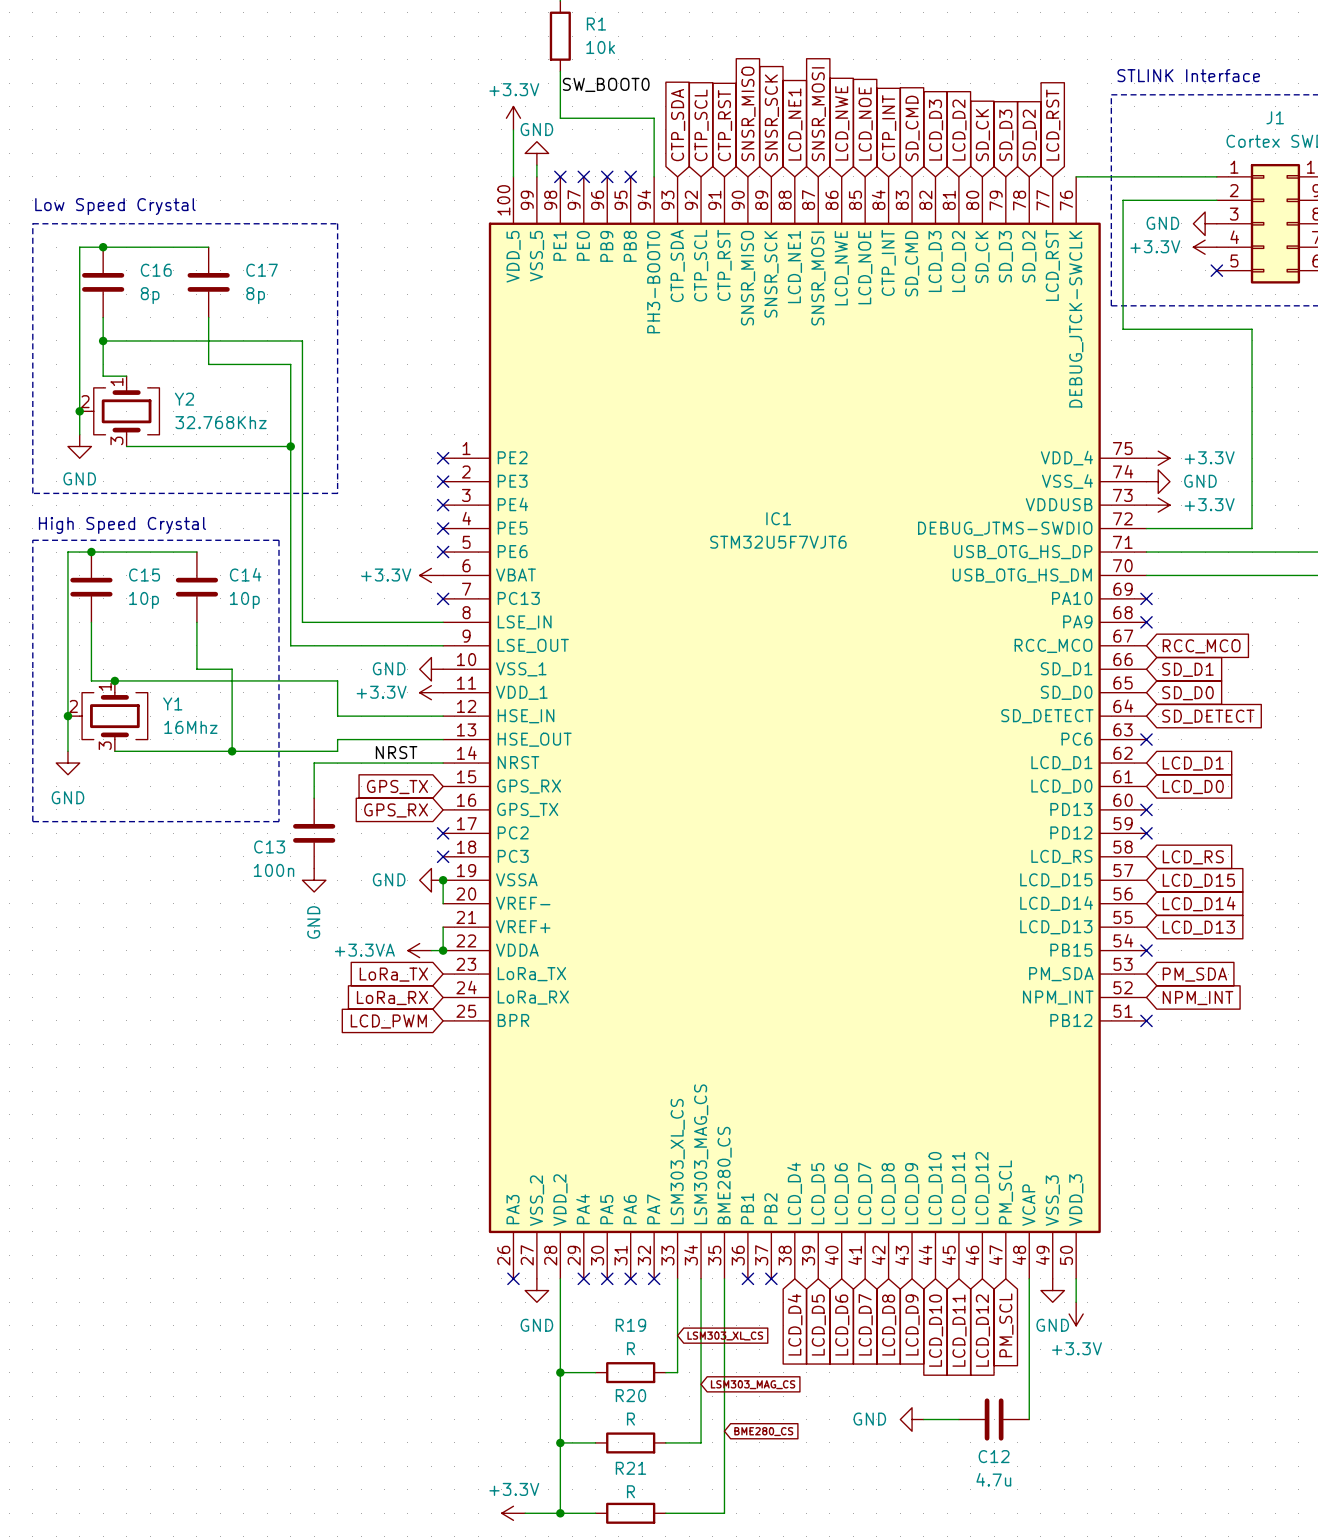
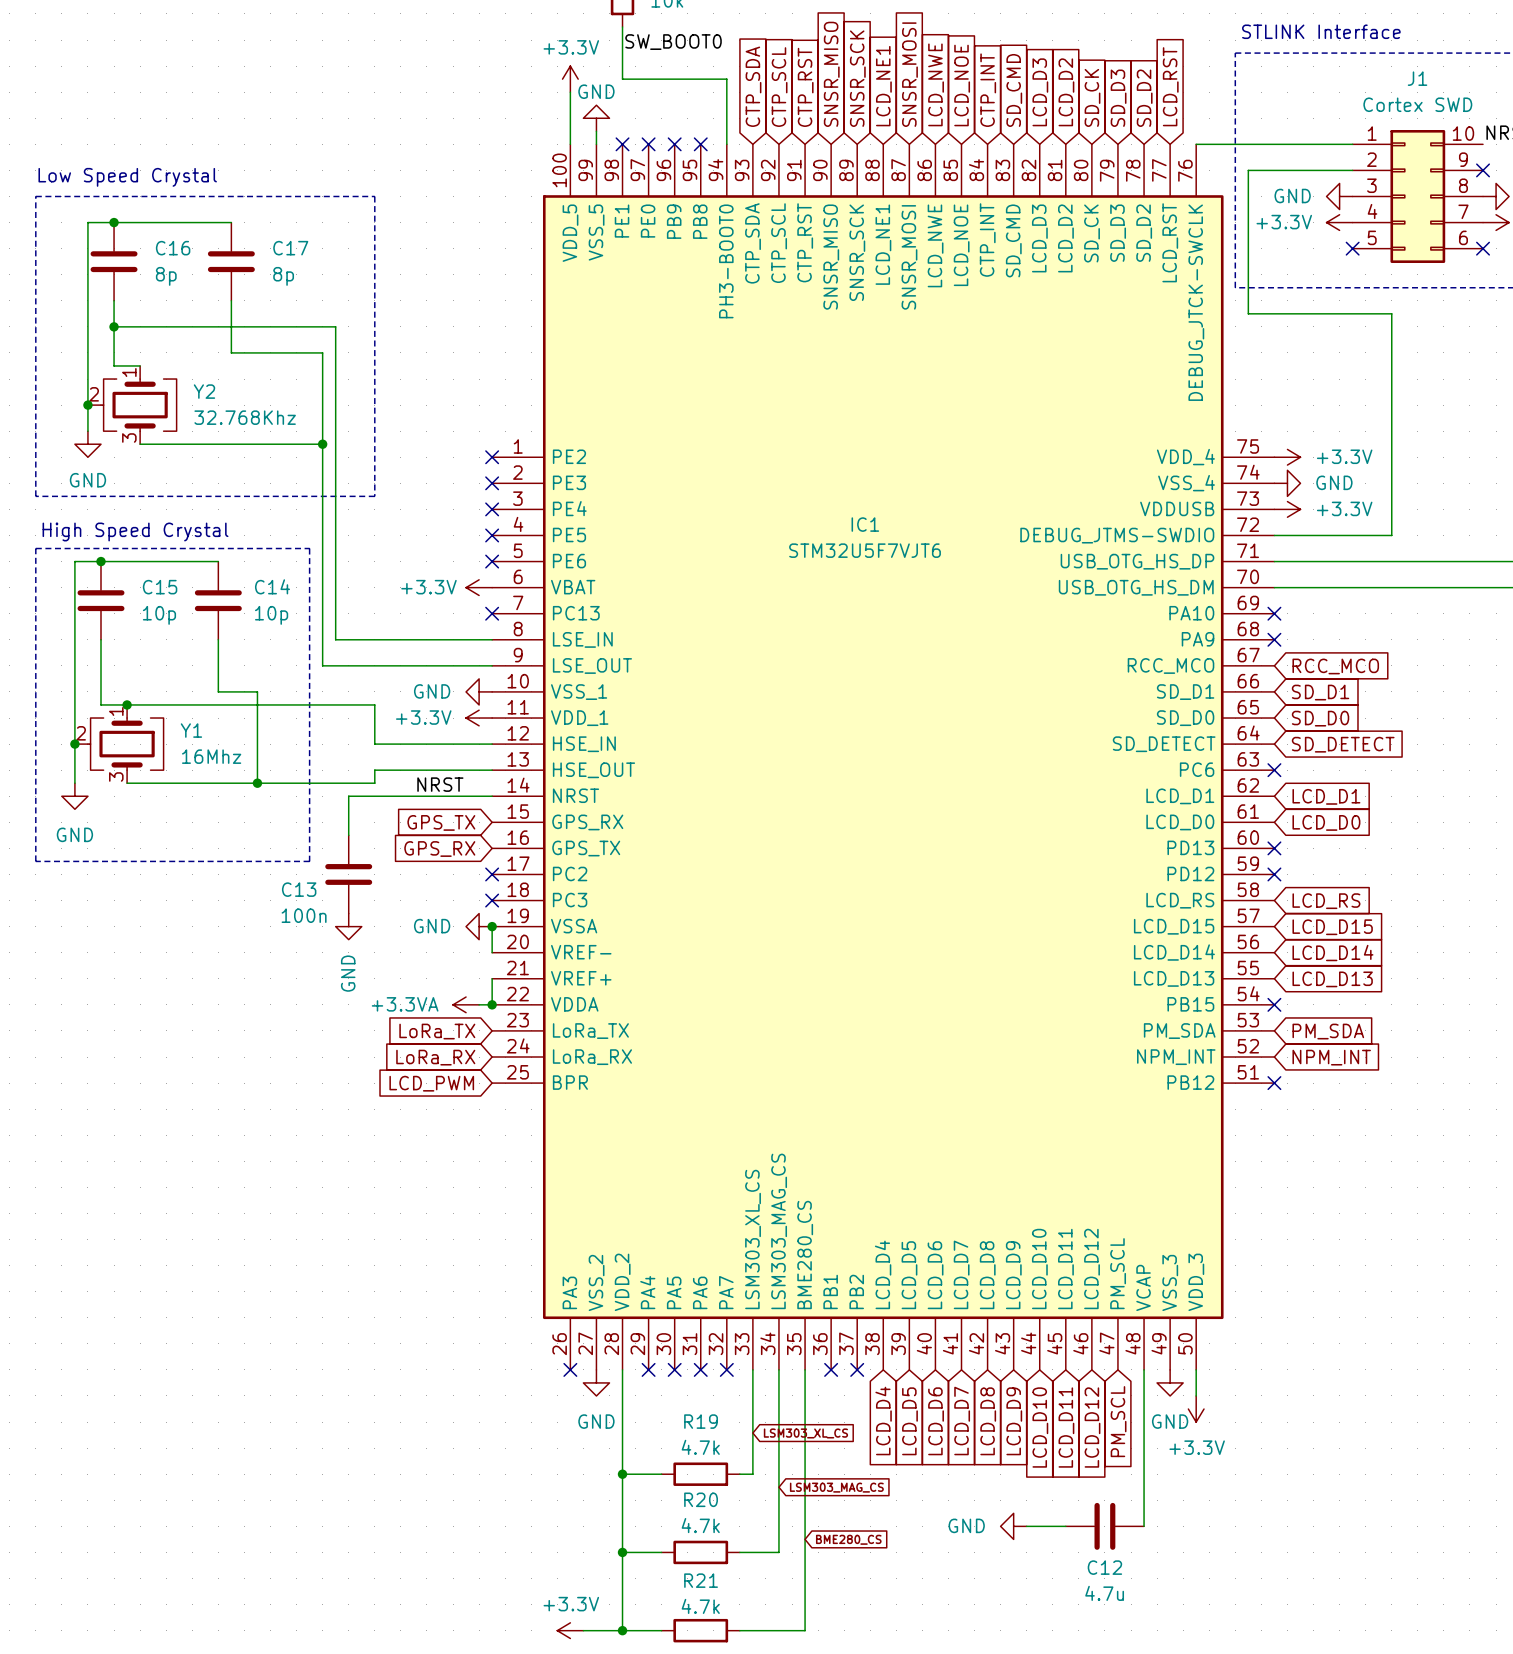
R19 value: R (630, 1348) -> 4.7k (700, 1447)
R20 value: R (630, 1419) -> 4.7k (700, 1525)
R21 value: R (630, 1491) -> 4.7k (700, 1606)

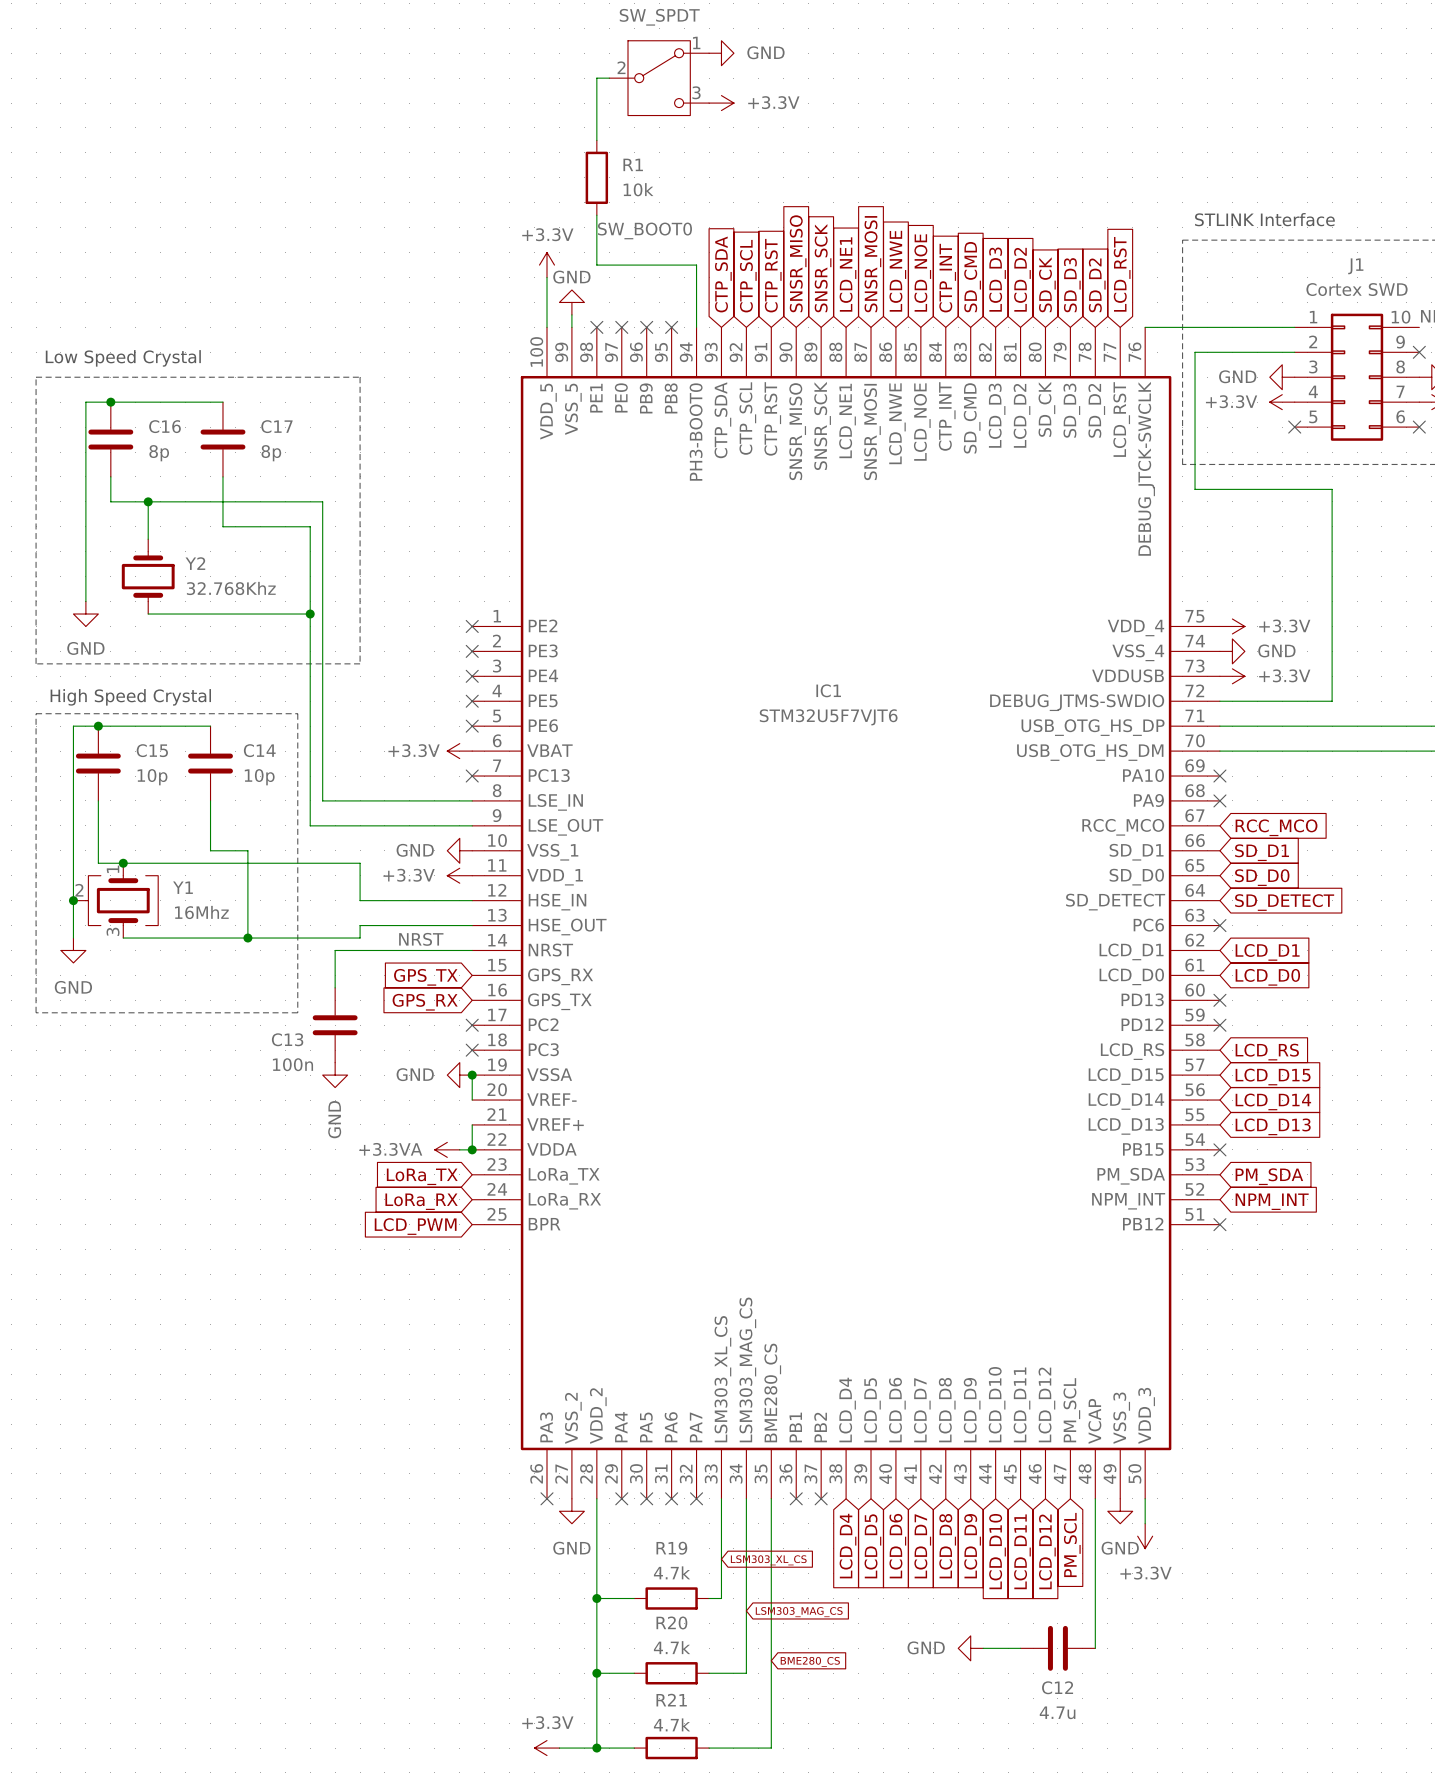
wire: (114, 326) (114, 365) (140, 365) -> none
junction position: (114, 326) -> (148, 501)
wire: none -> (148, 501) (148, 539)
Y2 symbol: [87, 365, 177, 445] -> [121, 539, 175, 615]
junction: (87, 405) -> none
wire: (140, 444) (153, 444) -> none

